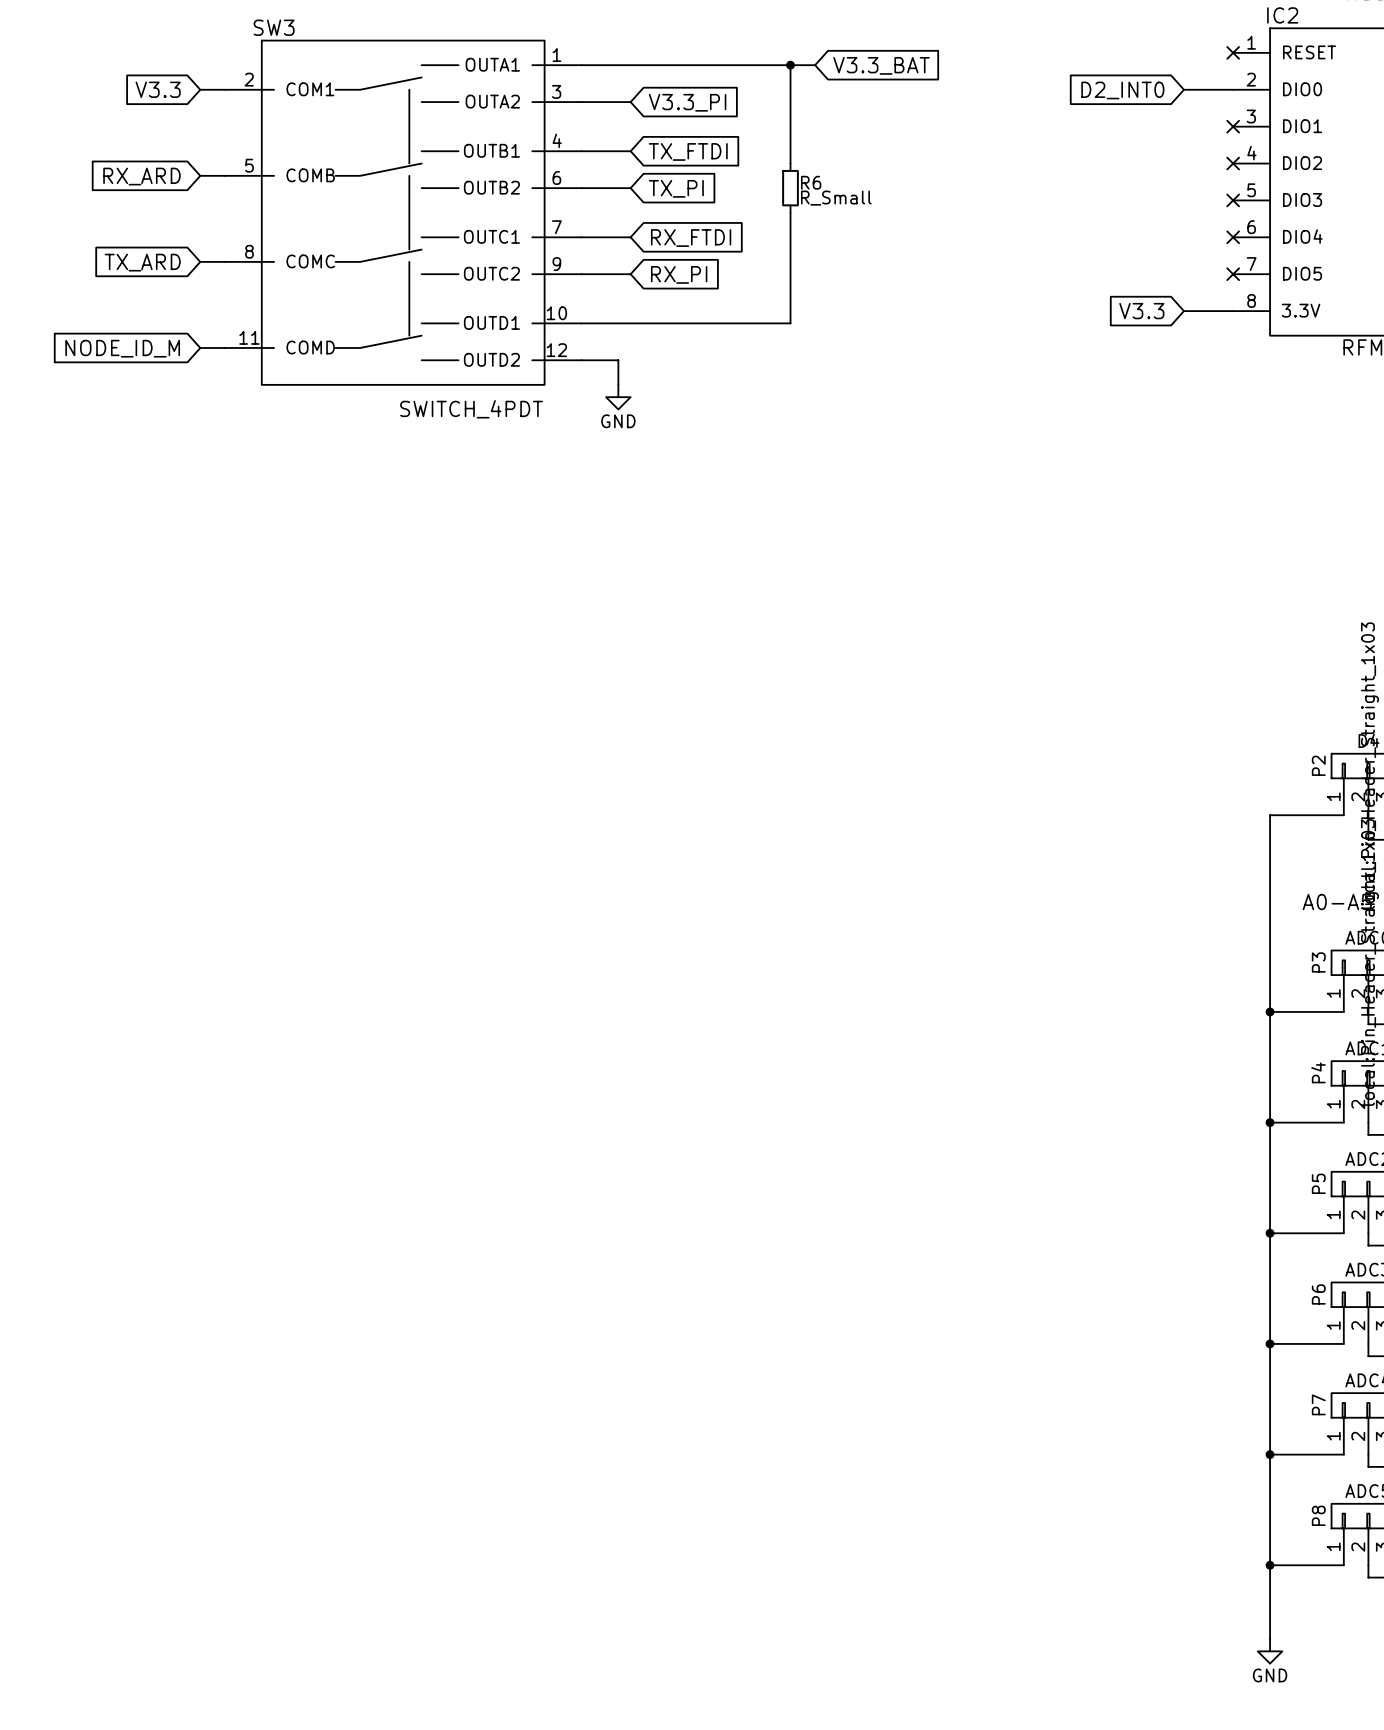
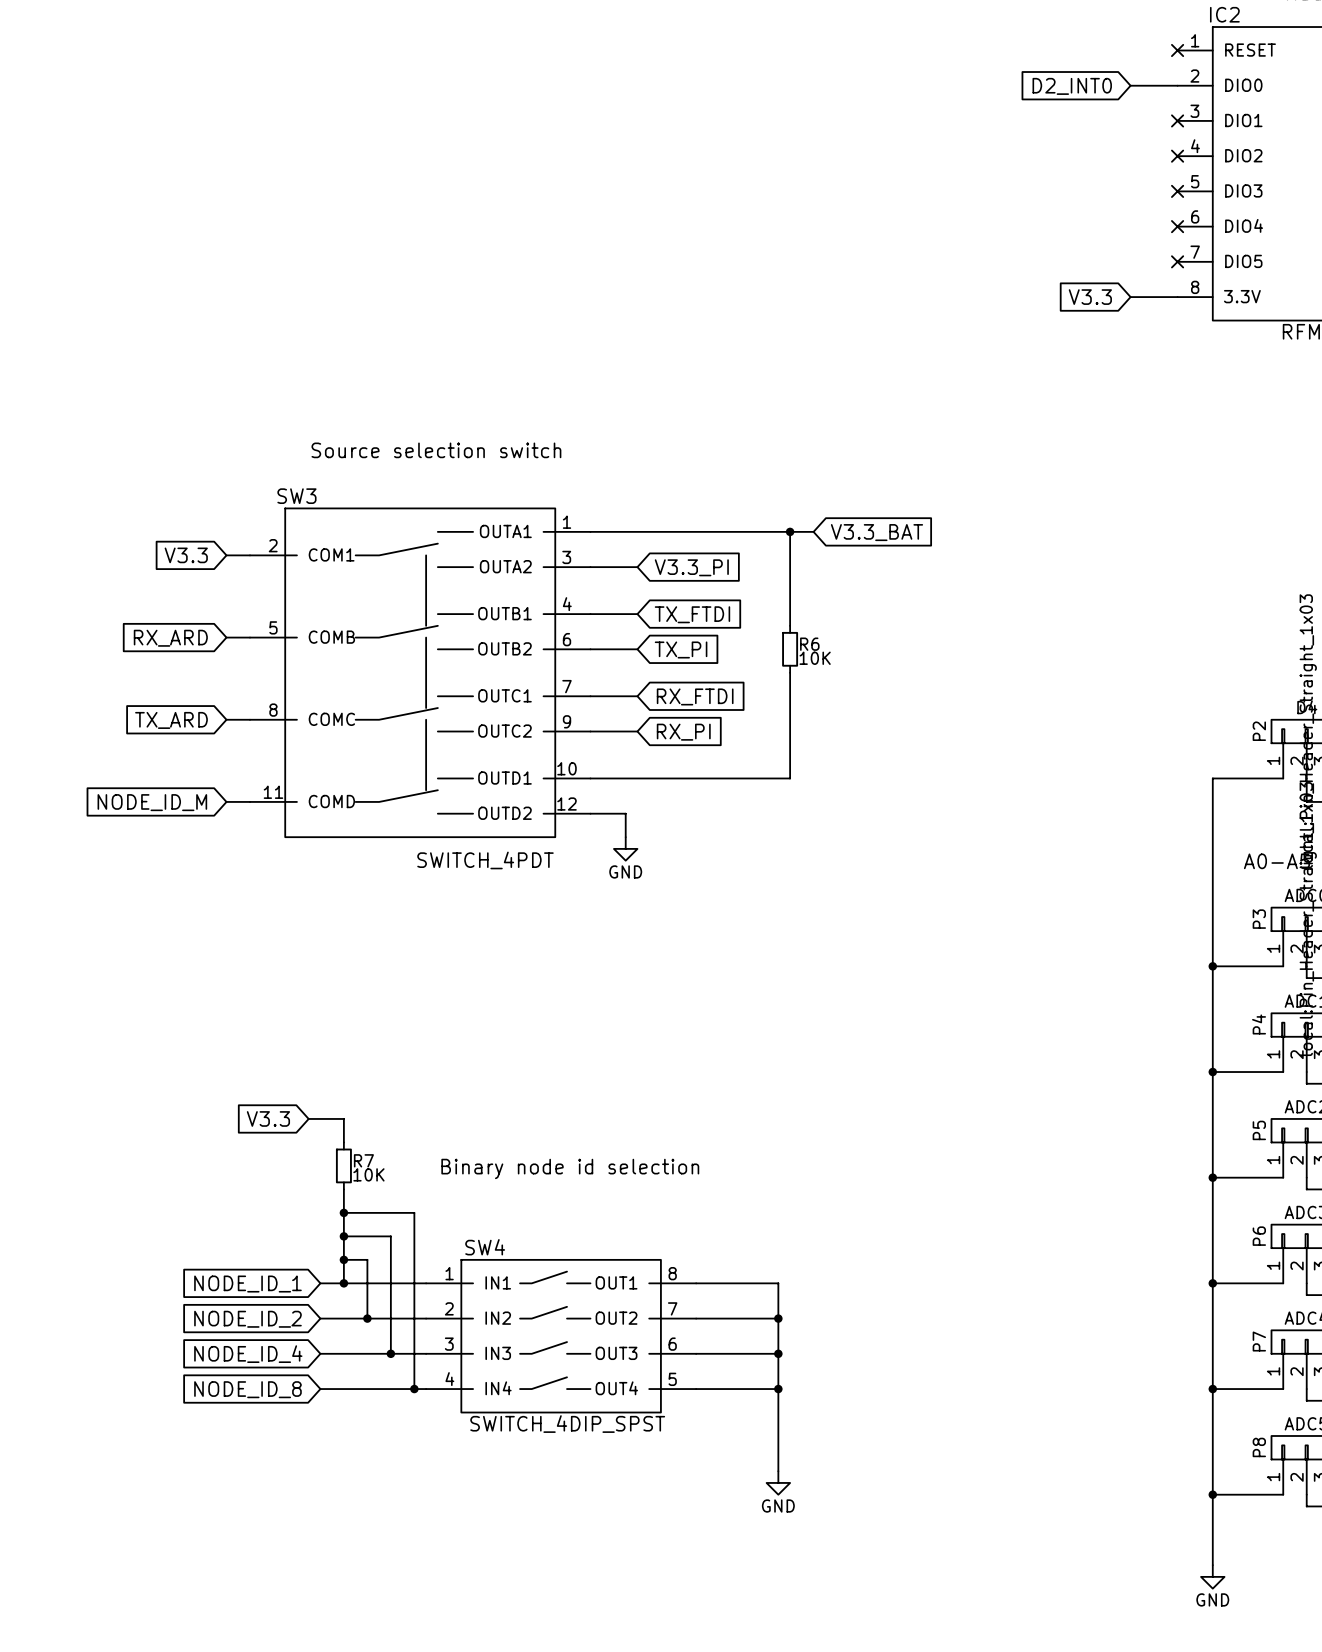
wire: (581, 65) (815, 65) -> none
wire: (790, 65) (790, 163) -> none
junction: (790, 65) -> none
global label: V3.3_BAT (881, 65) -> none
global label: V3.3 (158, 89) -> none
wire: (200, 89) (224, 89) -> none
wire: (581, 102) (630, 102) -> none
global label: V3.3_PI (687, 102) -> none
wire: (581, 151) (630, 151) -> none
global label: TX_FTDI (688, 151) -> none
wire: (200, 175) (224, 175) -> none
global label: RX_ARD (141, 176) -> none
wire: (581, 188) (630, 188) -> none
global label: TX_PI (676, 188) -> none
R6 position: (790, 188) -> (790, 649)
R6 value: R_Small (836, 198) -> 10K (815, 658)
SW3 position: (403, 212) -> (420, 672)
wire: (790, 212) (790, 323) (581, 323) -> none
wire: (581, 237) (630, 237) -> none
global label: RX_FTDI (691, 238) -> none
wire: (200, 261) (224, 261) -> none
global label: TX_ARD (142, 262) -> none
wire: (581, 274) (630, 274) -> none
global label: RX_PI (679, 274) -> none
wire: (200, 347) (224, 347) -> (226, 555) (249, 555)
global label: NODE_ID_M (122, 348) -> none
wire: (581, 360) (618, 360) (618, 384) -> none
power symbol: GND (618, 397) -> none
text: none -> Source selection switch (436, 450)
wire: none -> (590, 531) (813, 531)
wire: none -> (790, 531) (790, 625)
junction: none -> (790, 531)
global label: none -> V3.3_BAT (876, 532)
global label: none -> V3.3 (186, 555)
wire: none -> (590, 567) (637, 567)
global label: none -> V3.3_PI (691, 567)
wire: none -> (590, 614) (637, 614)
global label: none -> TX_FTDI (692, 614)
wire: none -> (226, 637) (249, 637)
global label: none -> RX_ARD (170, 638)
wire: none -> (590, 649) (637, 649)
global label: none -> TX_PI (681, 649)
wire: none -> (790, 672) (790, 778) (590, 778)
wire: none -> (590, 696) (637, 696)
global label: none -> RX_FTDI (695, 696)
wire: none -> (226, 719) (249, 719)
global label: none -> TX_ARD (171, 720)
wire: none -> (590, 731) (637, 731)
global label: none -> RX_PI (683, 732)
wire: none -> (226, 801) (249, 801)
global label: none -> NODE_ID_M (152, 802)
wire: none -> (590, 813) (625, 813) (625, 837)
power symbol: none -> GND (625, 848)
global label: none -> V3.3 (268, 1118)
wire: none -> (308, 1118) (343, 1118) (343, 1142)
R7: none -> 10K (343, 1165)
text: none -> Binary node id selection (570, 1168)
wire: none -> (343, 1189) (343, 1283)
wire: none -> (343, 1212) (414, 1212) (414, 1389)
junction: none -> (343, 1212)
wire: none -> (343, 1236) (390, 1236) (390, 1353)
junction: none -> (343, 1236)
wire: none -> (343, 1259) (367, 1259) (367, 1318)
junction: none -> (343, 1259)
wire: none -> (320, 1283) (426, 1283)
junction: none -> (343, 1283)
wire: none -> (696, 1283) (778, 1283) (778, 1471)
global label: none -> NODE_ID_1 (247, 1284)
wire: none -> (320, 1318) (426, 1318)
junction: none -> (367, 1318)
wire: none -> (696, 1318) (778, 1318)
junction: none -> (778, 1318)
global label: none -> NODE_ID_2 (247, 1319)
SW4: none -> SWITCH_4DIP_SPST (561, 1336)
wire: none -> (320, 1353) (426, 1353)
junction: none -> (390, 1353)
wire: none -> (696, 1353) (778, 1353)
junction: none -> (778, 1353)
global label: none -> NODE_ID_4 (248, 1354)
wire: none -> (320, 1389) (426, 1389)
junction: none -> (414, 1389)
wire: none -> (696, 1389) (778, 1389)
junction: none -> (778, 1389)
global label: none -> NODE_ID_8 (247, 1389)
power symbol: none -> GND (778, 1482)

